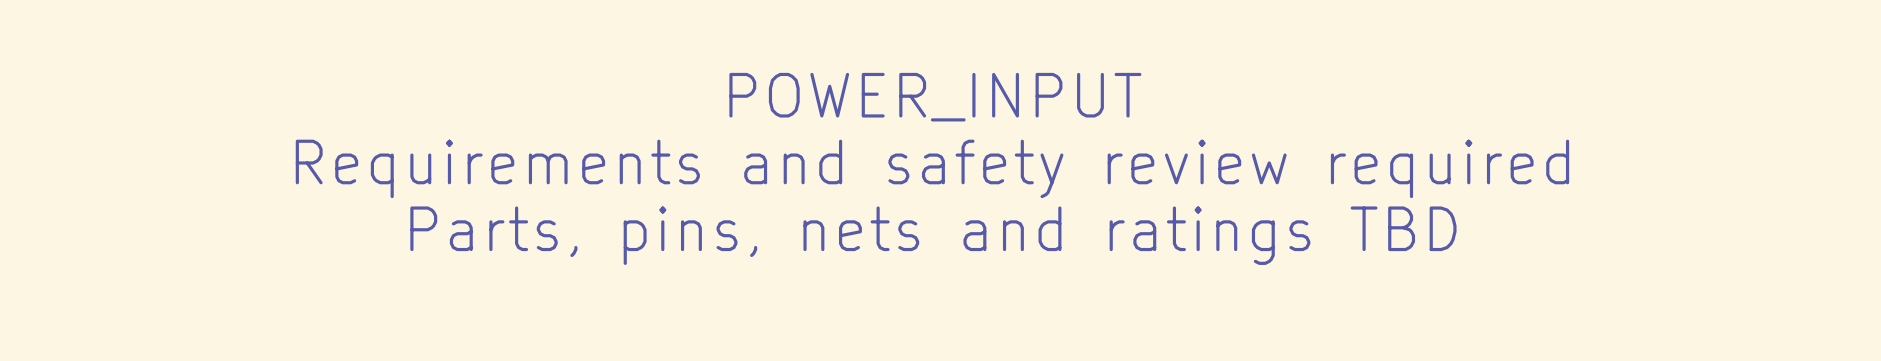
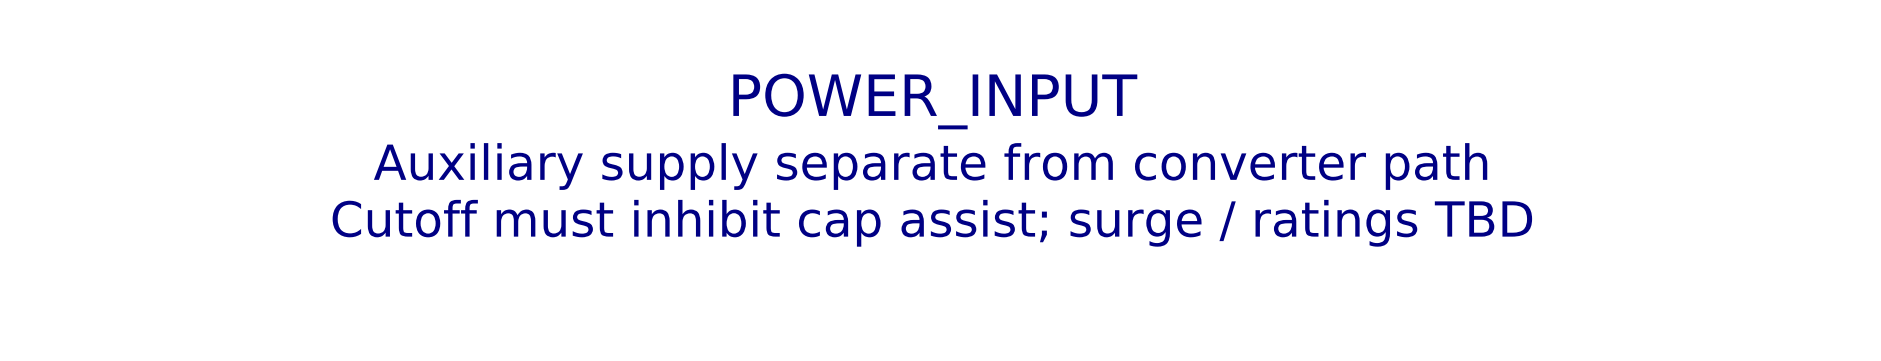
text: Requirements and safety review required (932, 168) -> Auxiliary supply separate from converter path (930, 166)
text: Parts, pins, nets and ratings TBD (933, 235) -> Cutoff must inhibit cap assist; surge / ratings TBD (932, 223)

